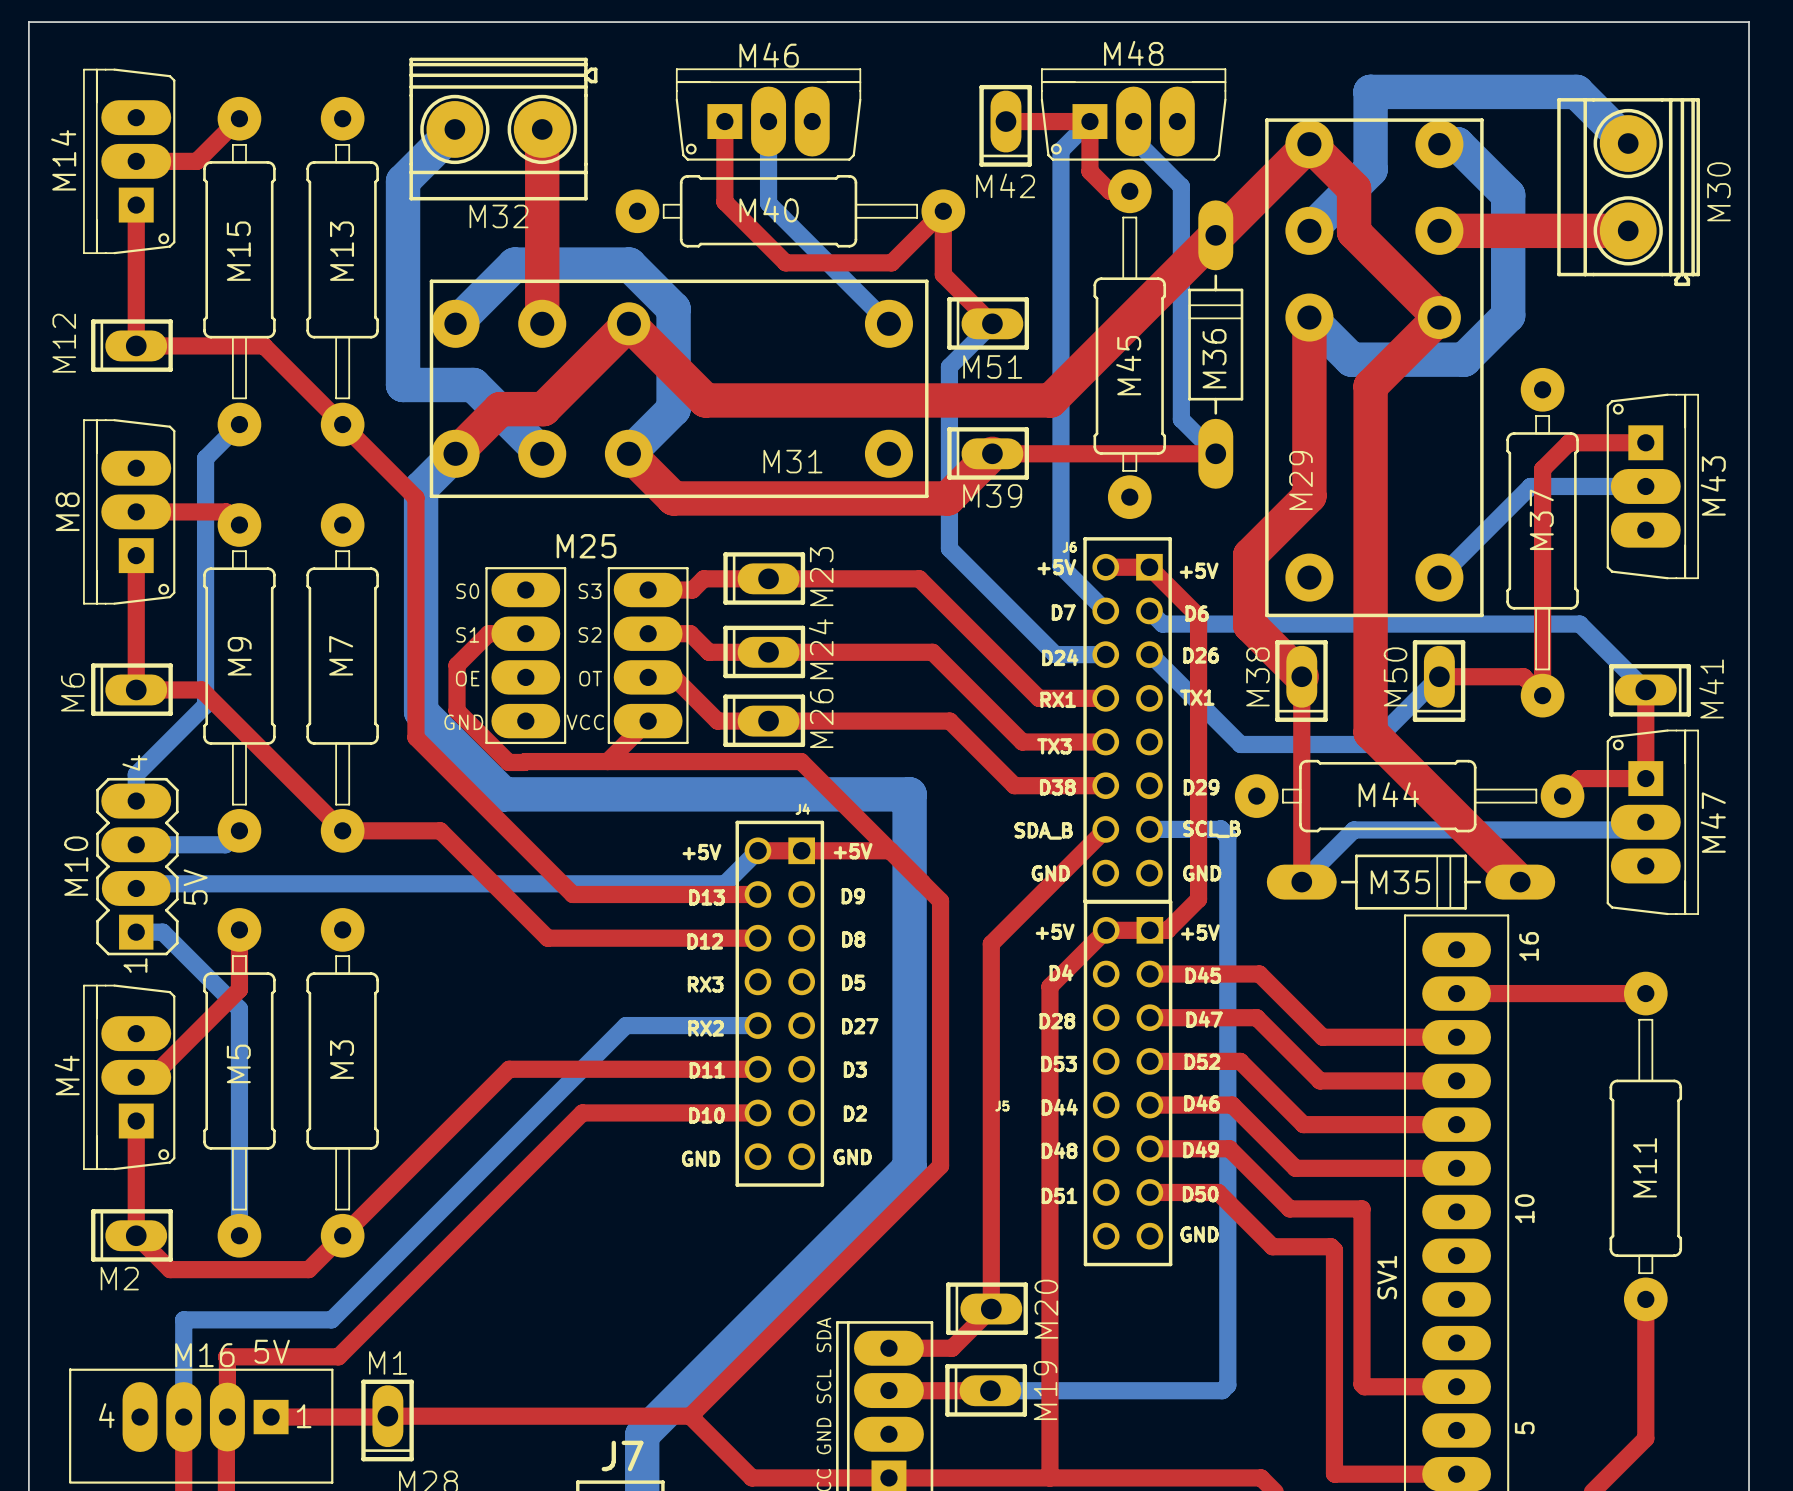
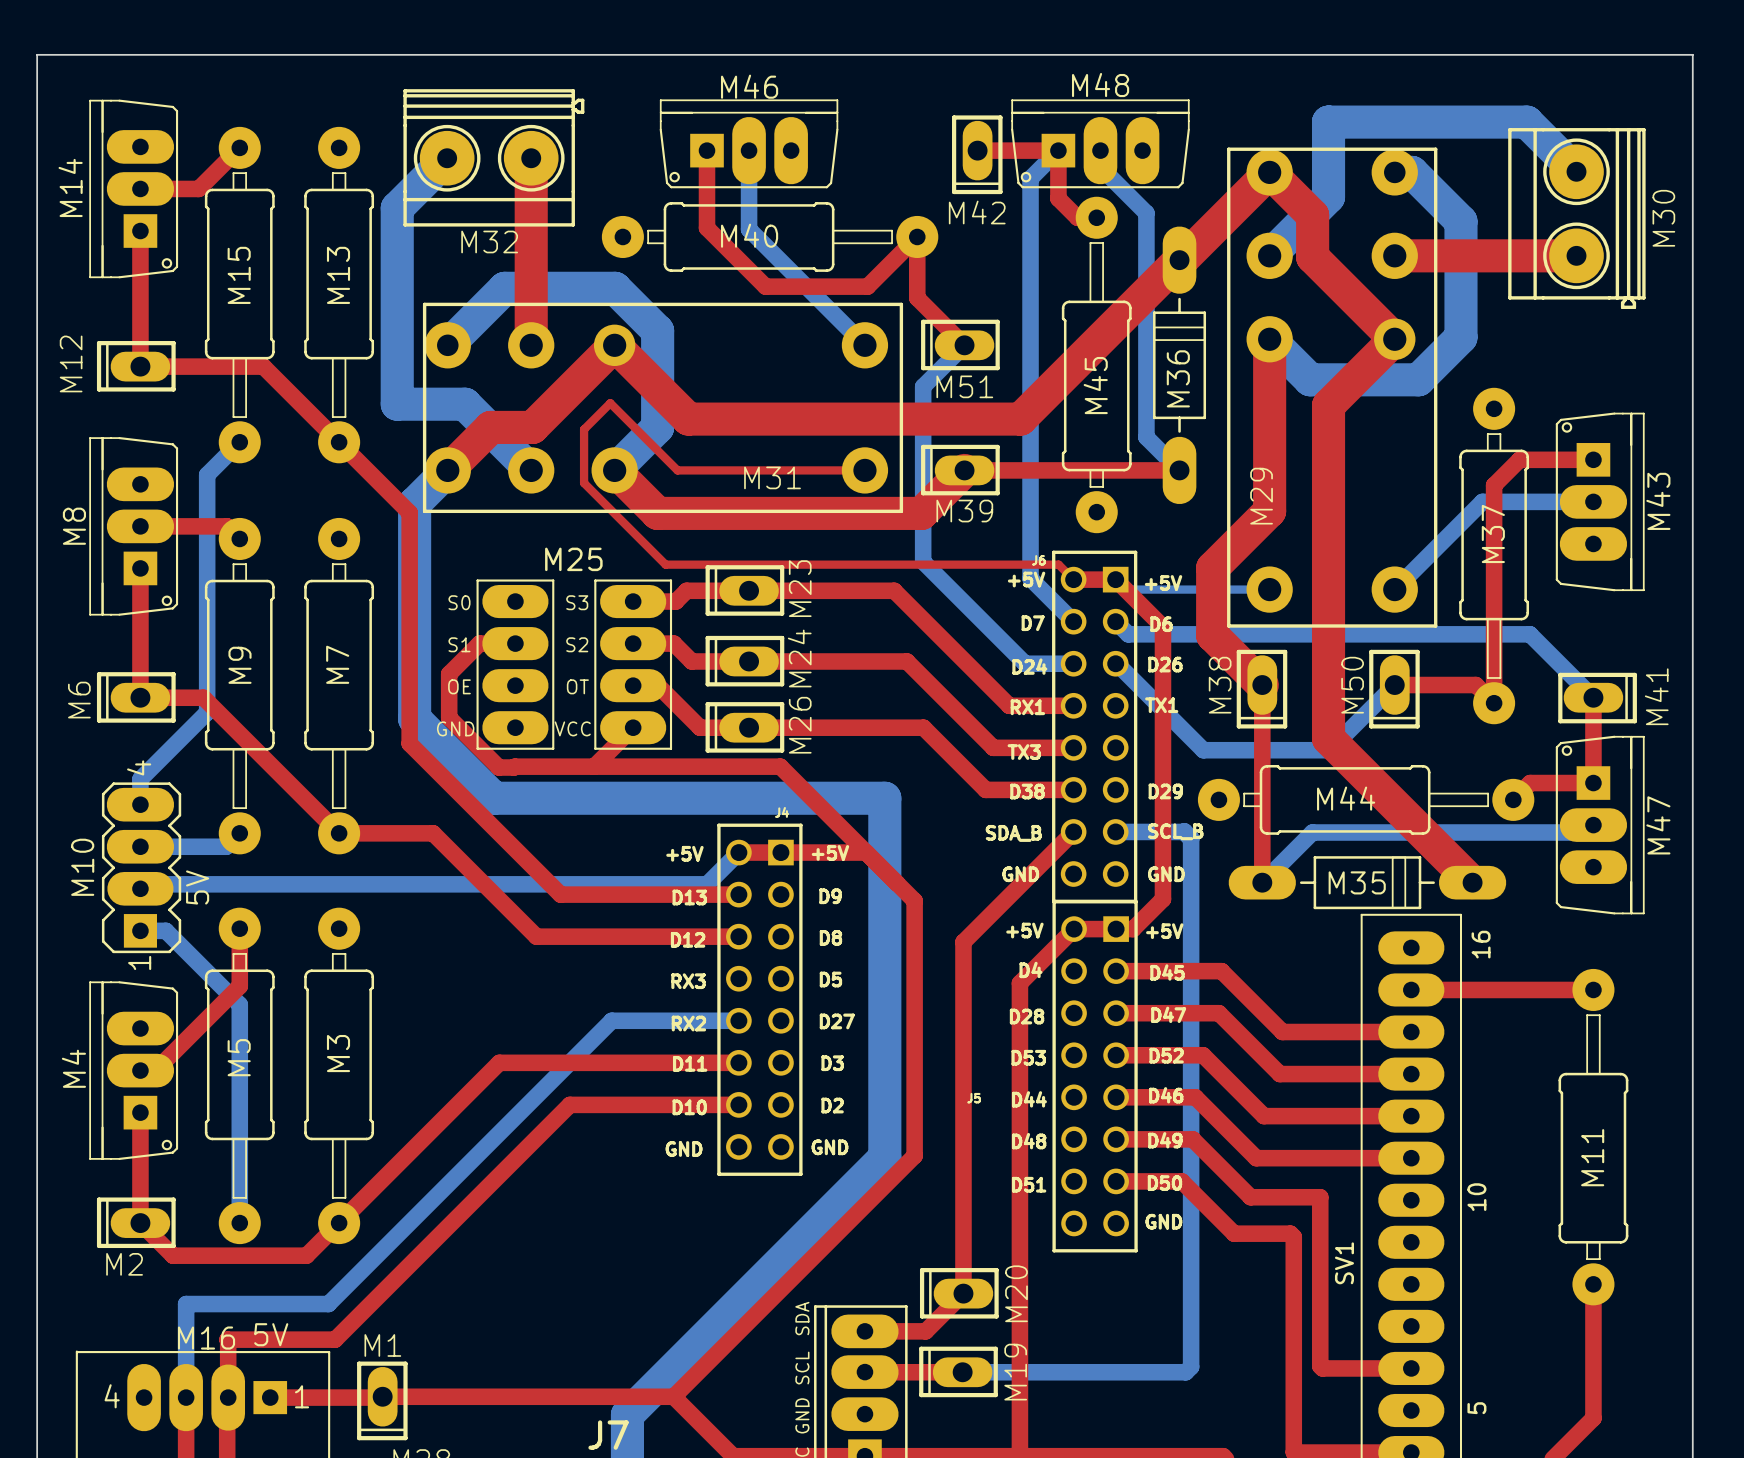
top track: none -> (864, 470) (677, 470) (610, 403) (584, 429) (584, 483) (665, 564) (1058, 564) (1073, 579)
bottom track: none -> (1115, 579) (1125, 589) (1269, 589)

